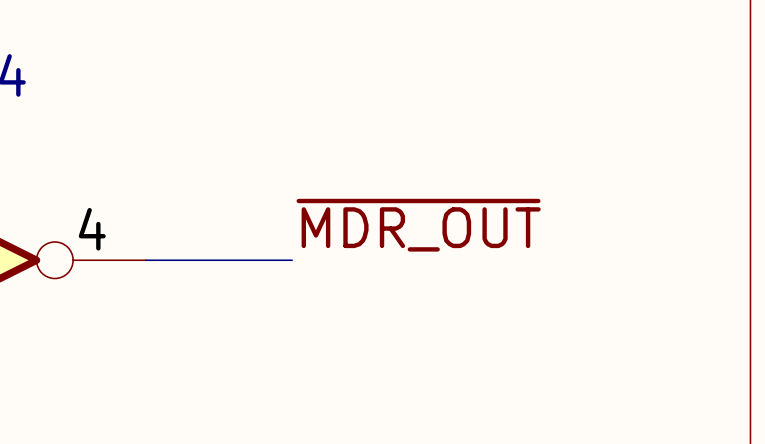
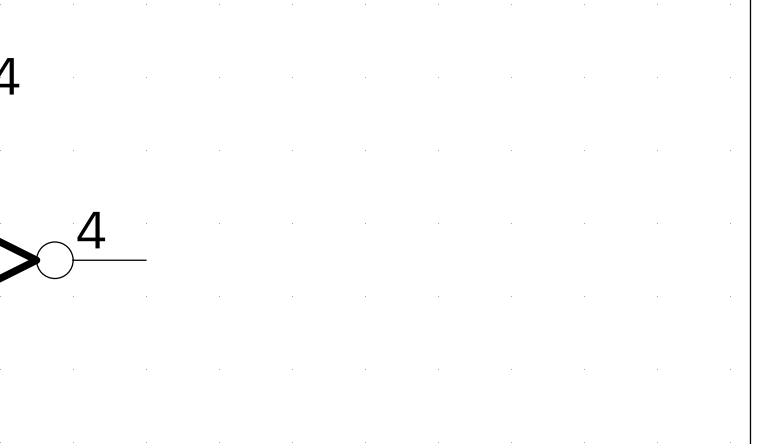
label: ~{MDR_OUT} (418, 225) -> none
wire: (146, 260) (292, 260) -> none

